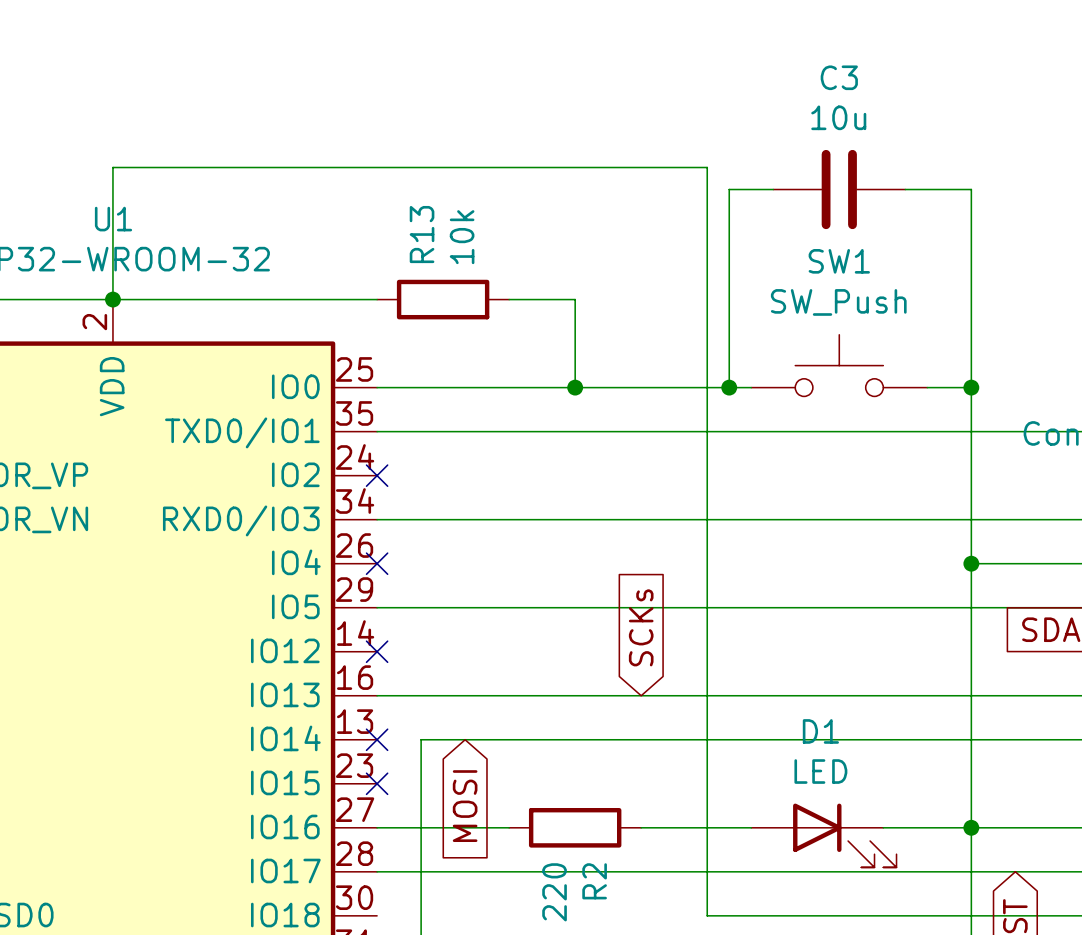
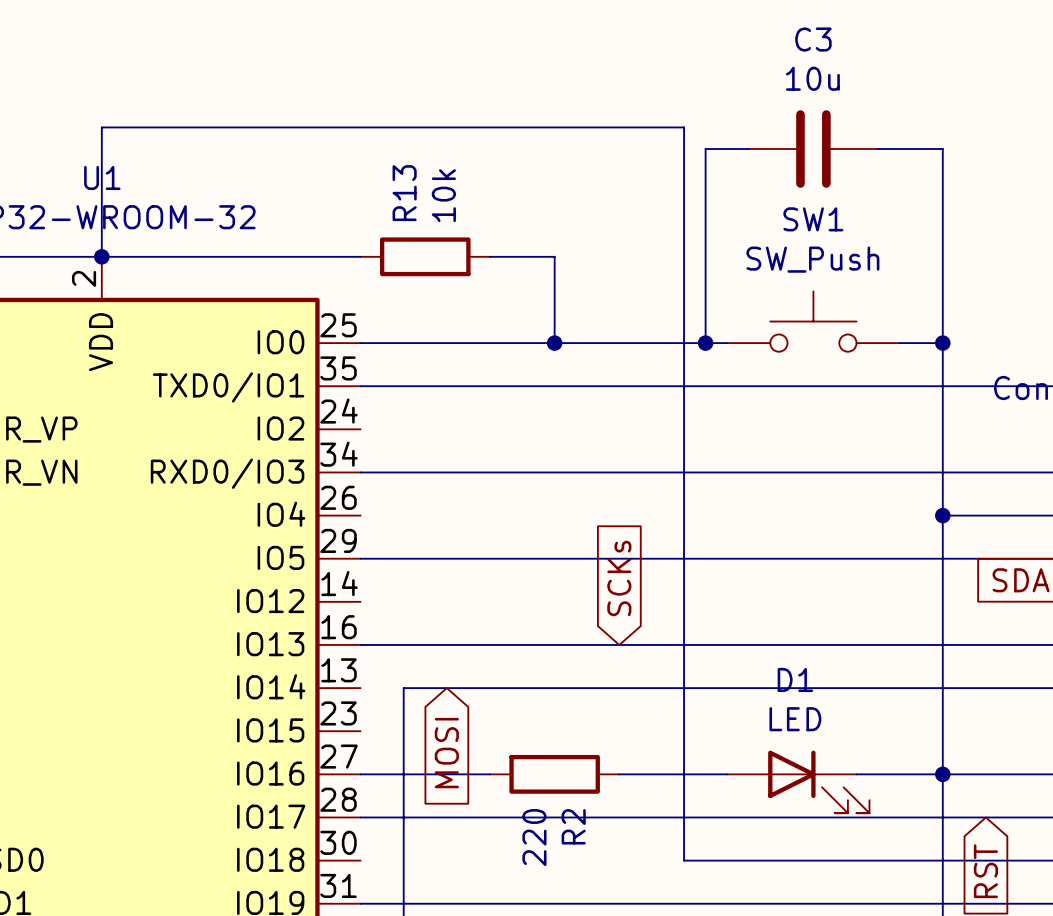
no-connect mark: (377, 475) -> none
no-connect mark: (377, 563) -> none
no-connect mark: (377, 651) -> none
no-connect mark: (377, 739) -> none
no-connect mark: (377, 783) -> none

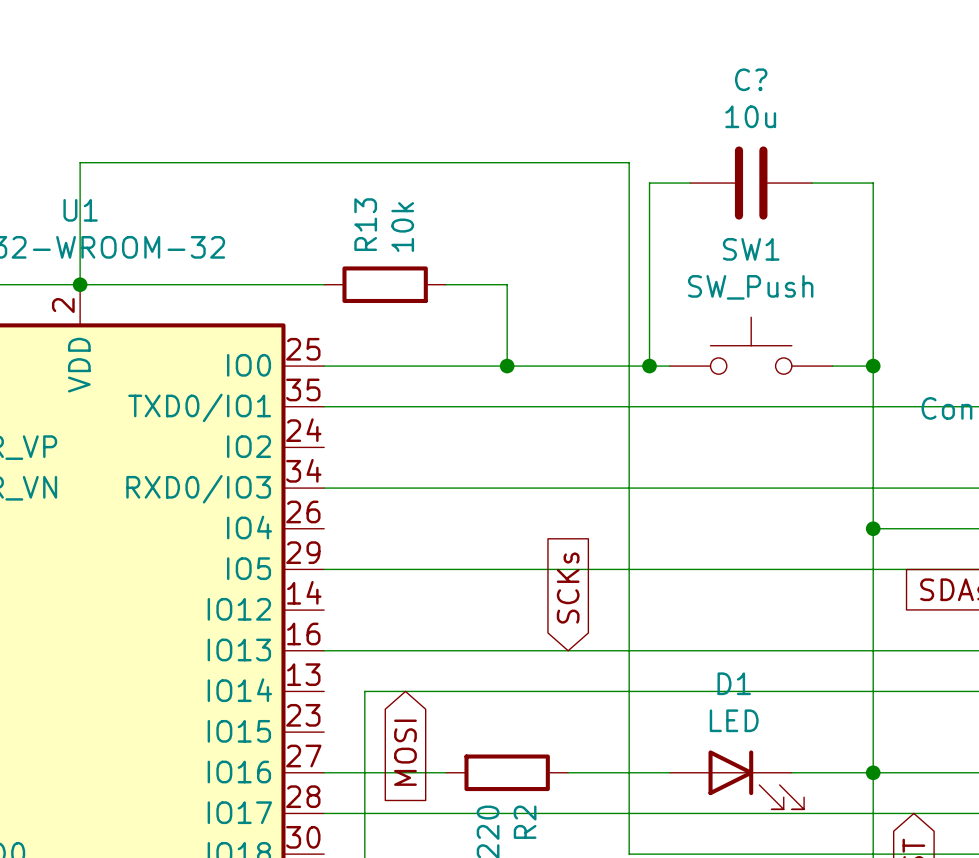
C3 name: C3 (813, 39) -> C? (751, 79)

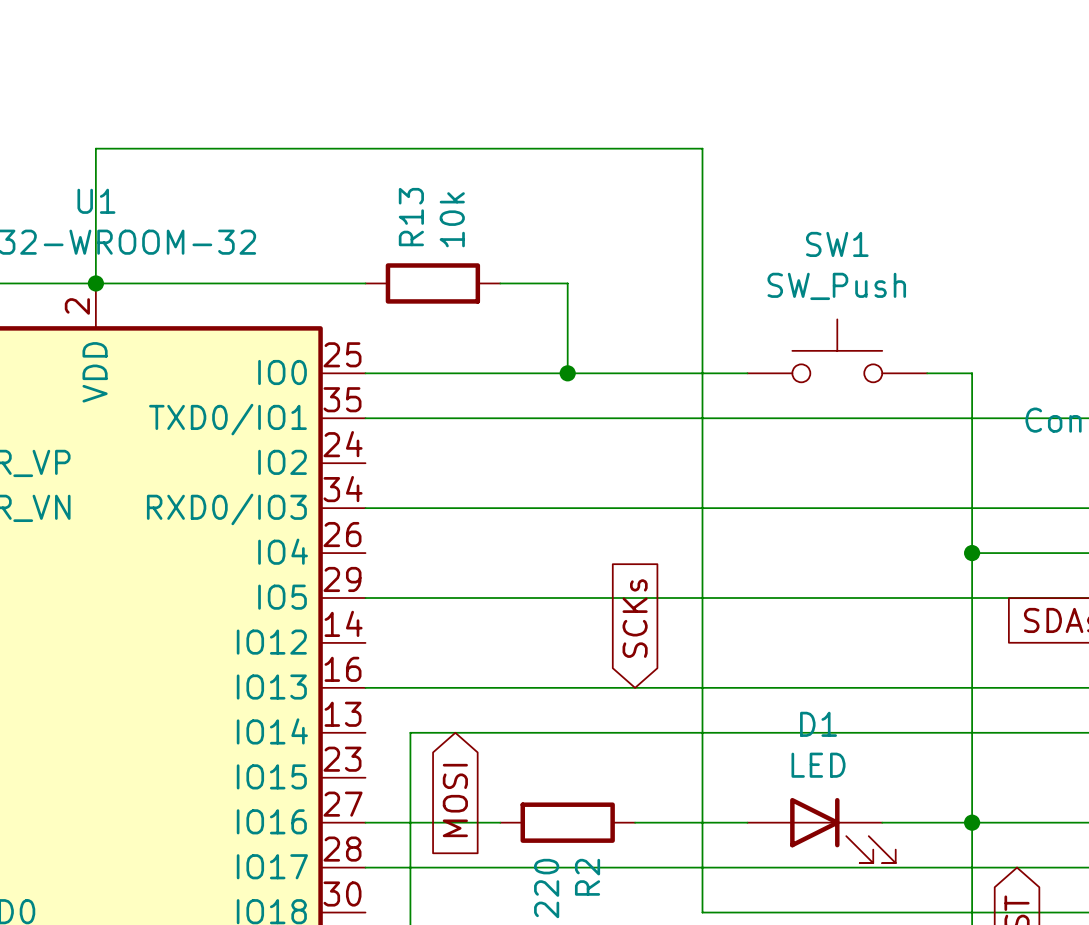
wire: (690, 183) (649, 183) (649, 366) -> none
C?: 10u (751, 183) -> none
wire: (812, 183) (873, 183) (873, 366) -> none
junction: (649, 366) -> none
junction: (873, 366) -> none

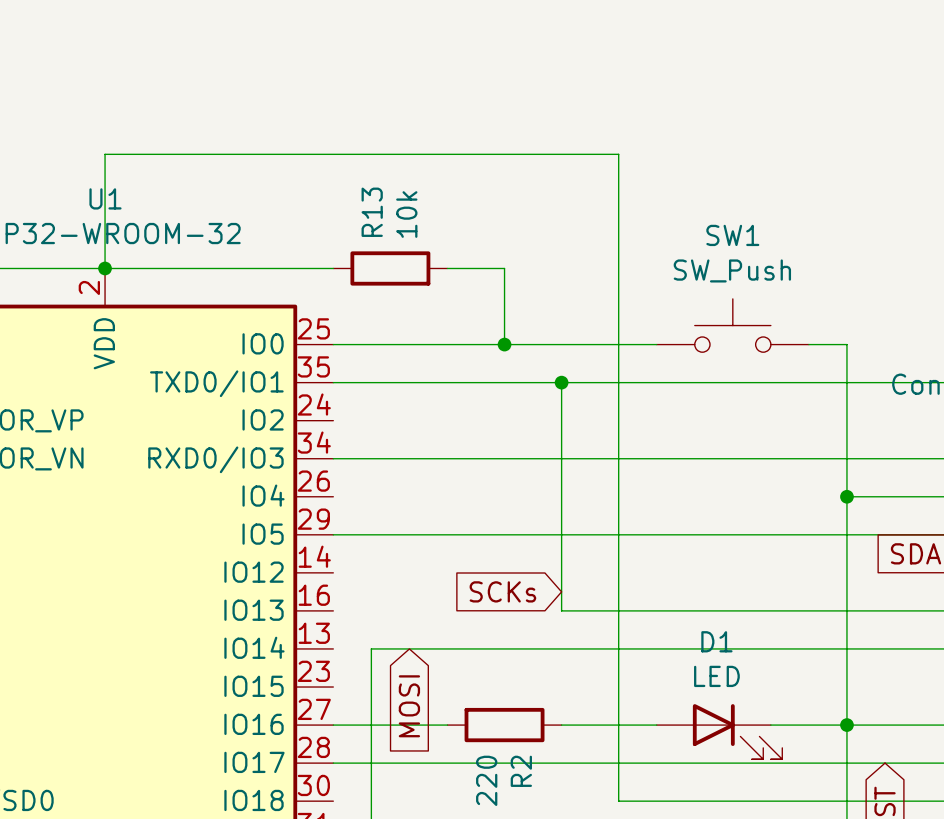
junction: none -> (561, 382)
global label rotation: 0° (635, 618) -> 90° counterclockwise (502, 591)
wire: (365, 687) (635, 687) -> (561, 382) (561, 610)

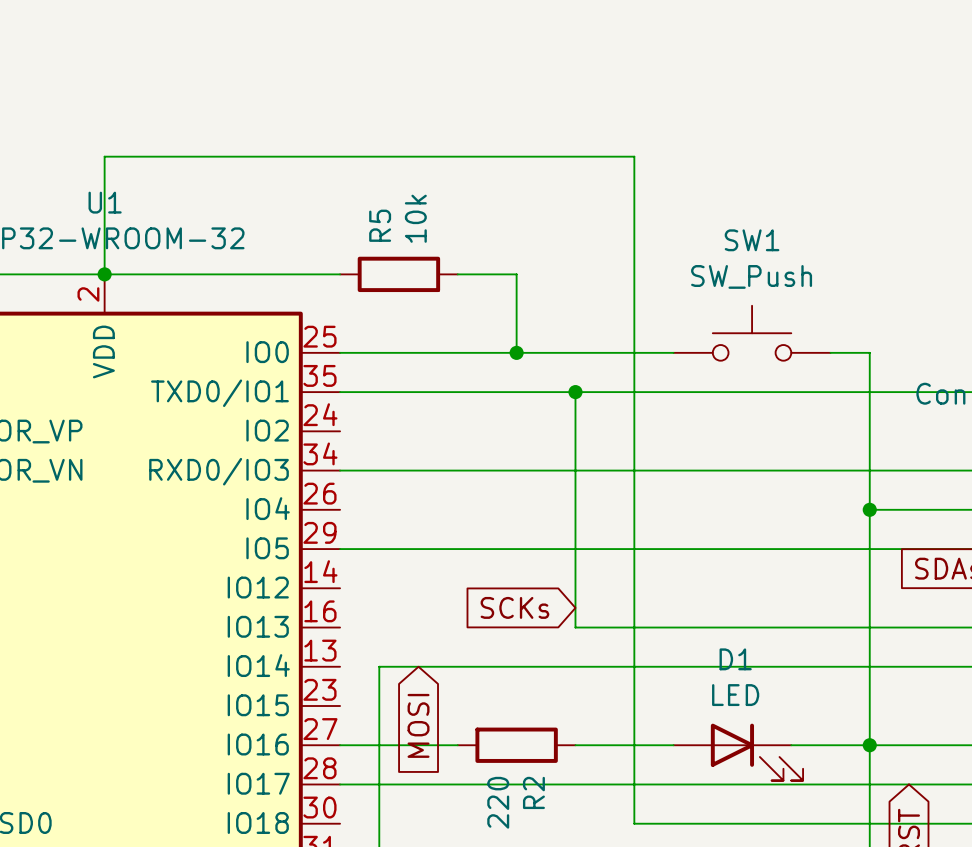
R13 name: R13 (372, 212) -> R5 (380, 225)

